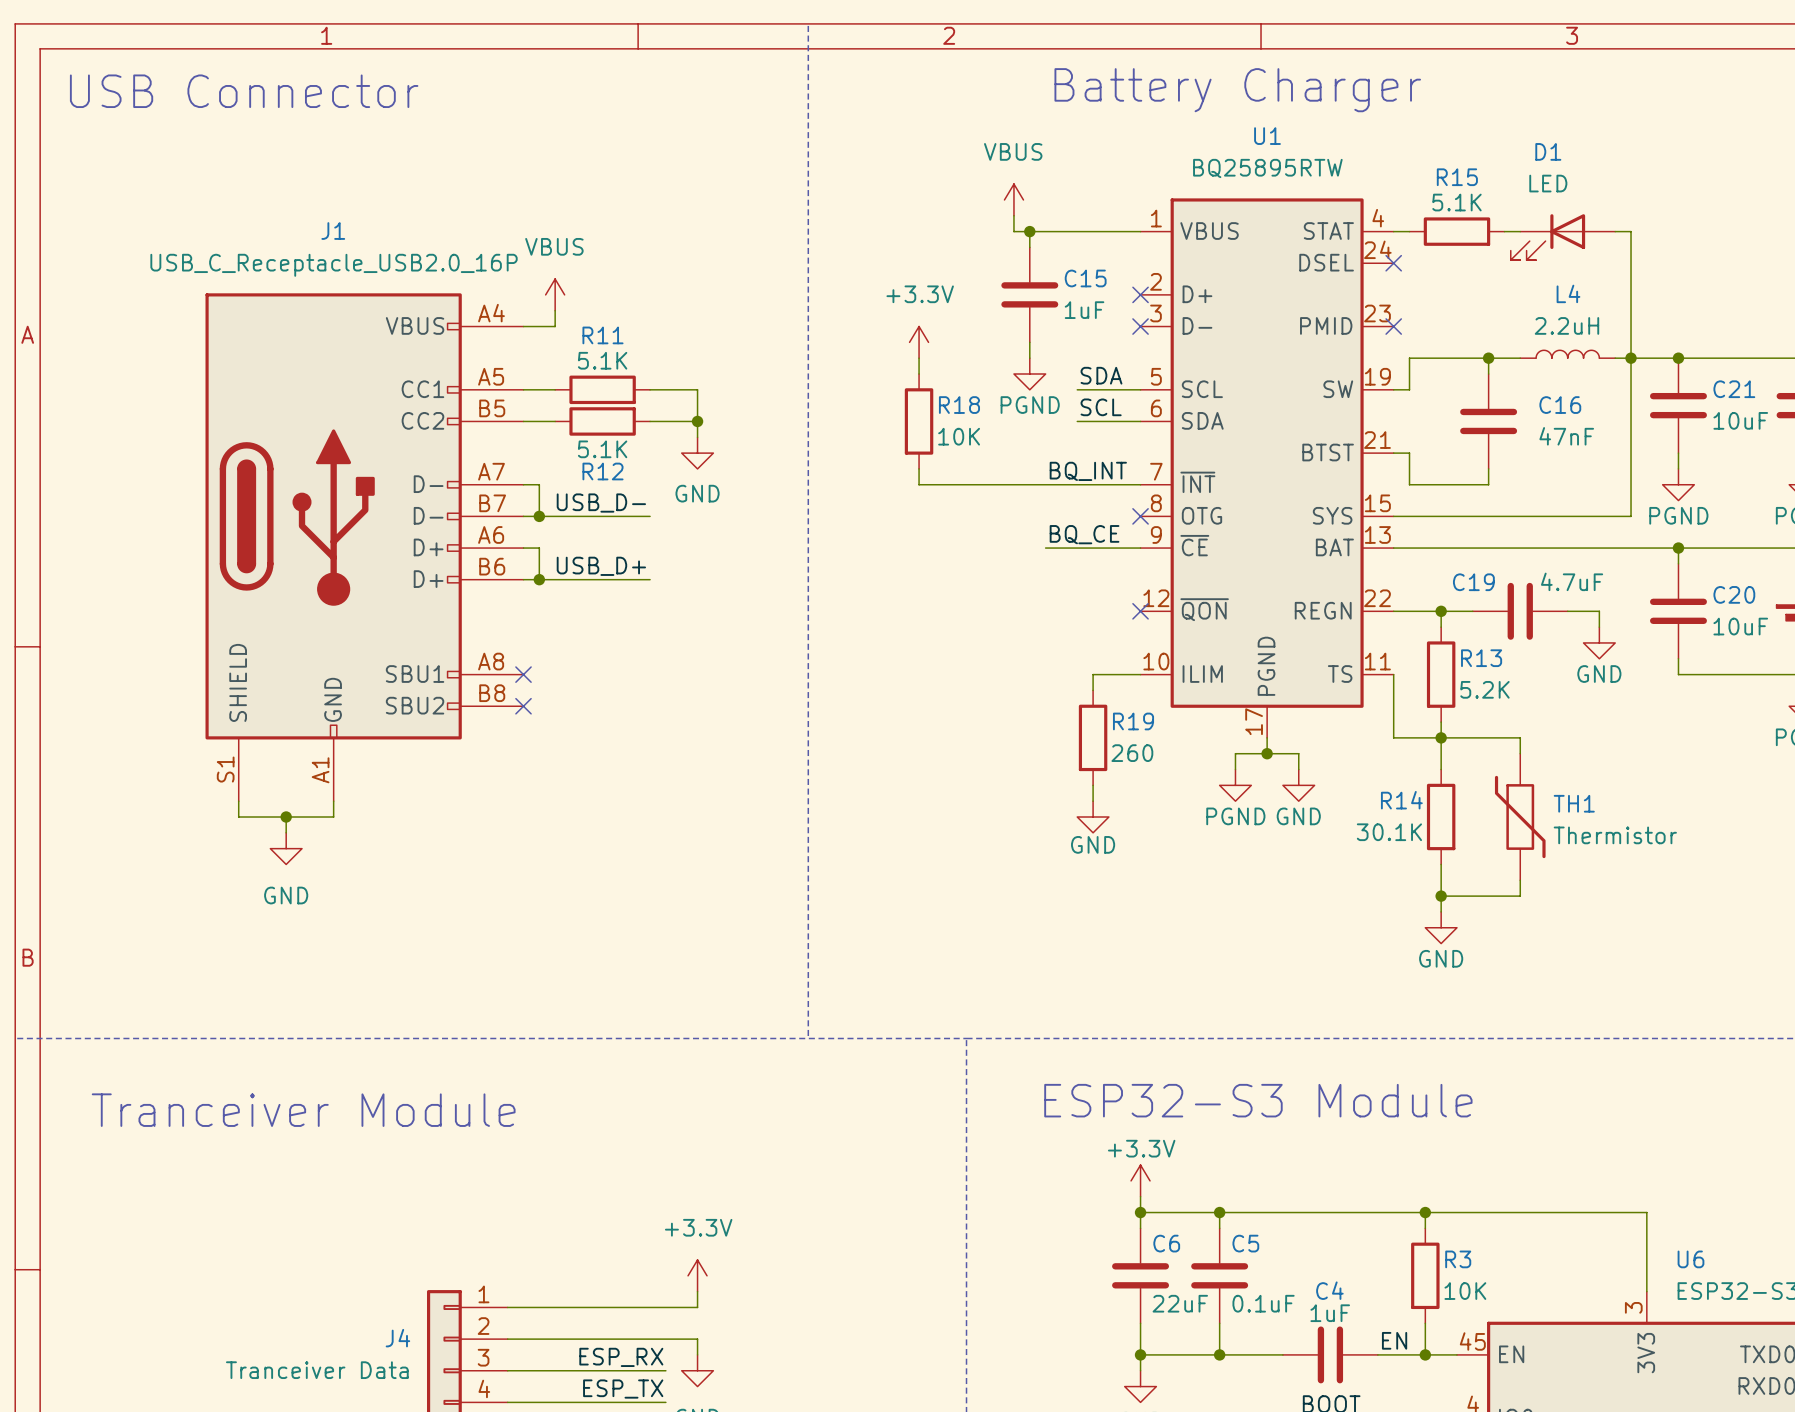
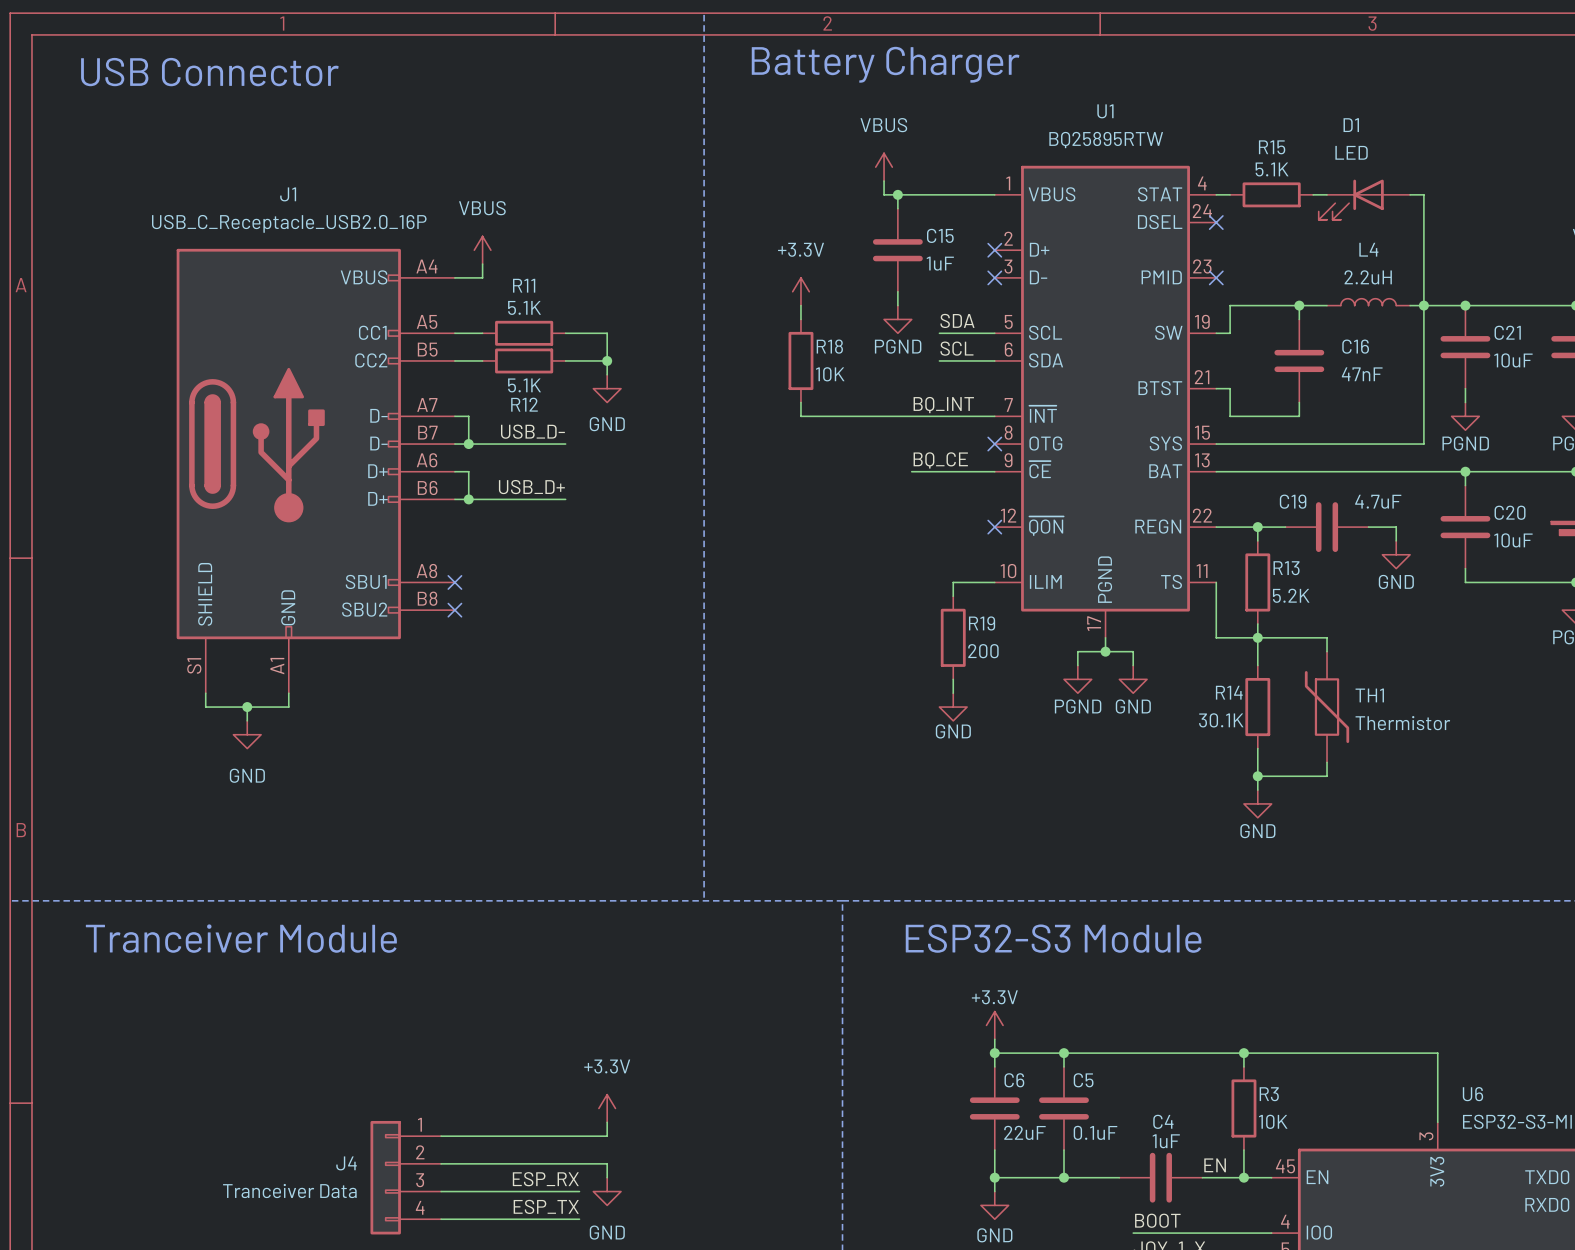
text position: Battery Charger (1237, 90) -> Battery Charger (885, 64)
R19 value: 260 (1132, 753) -> 200 (983, 651)
text position: ESP32-S3 Module (1258, 1100) -> ESP32-S3 Module (1053, 938)
text position: Tranceiver Module (303, 1110) -> Tranceiver Module (241, 938)

